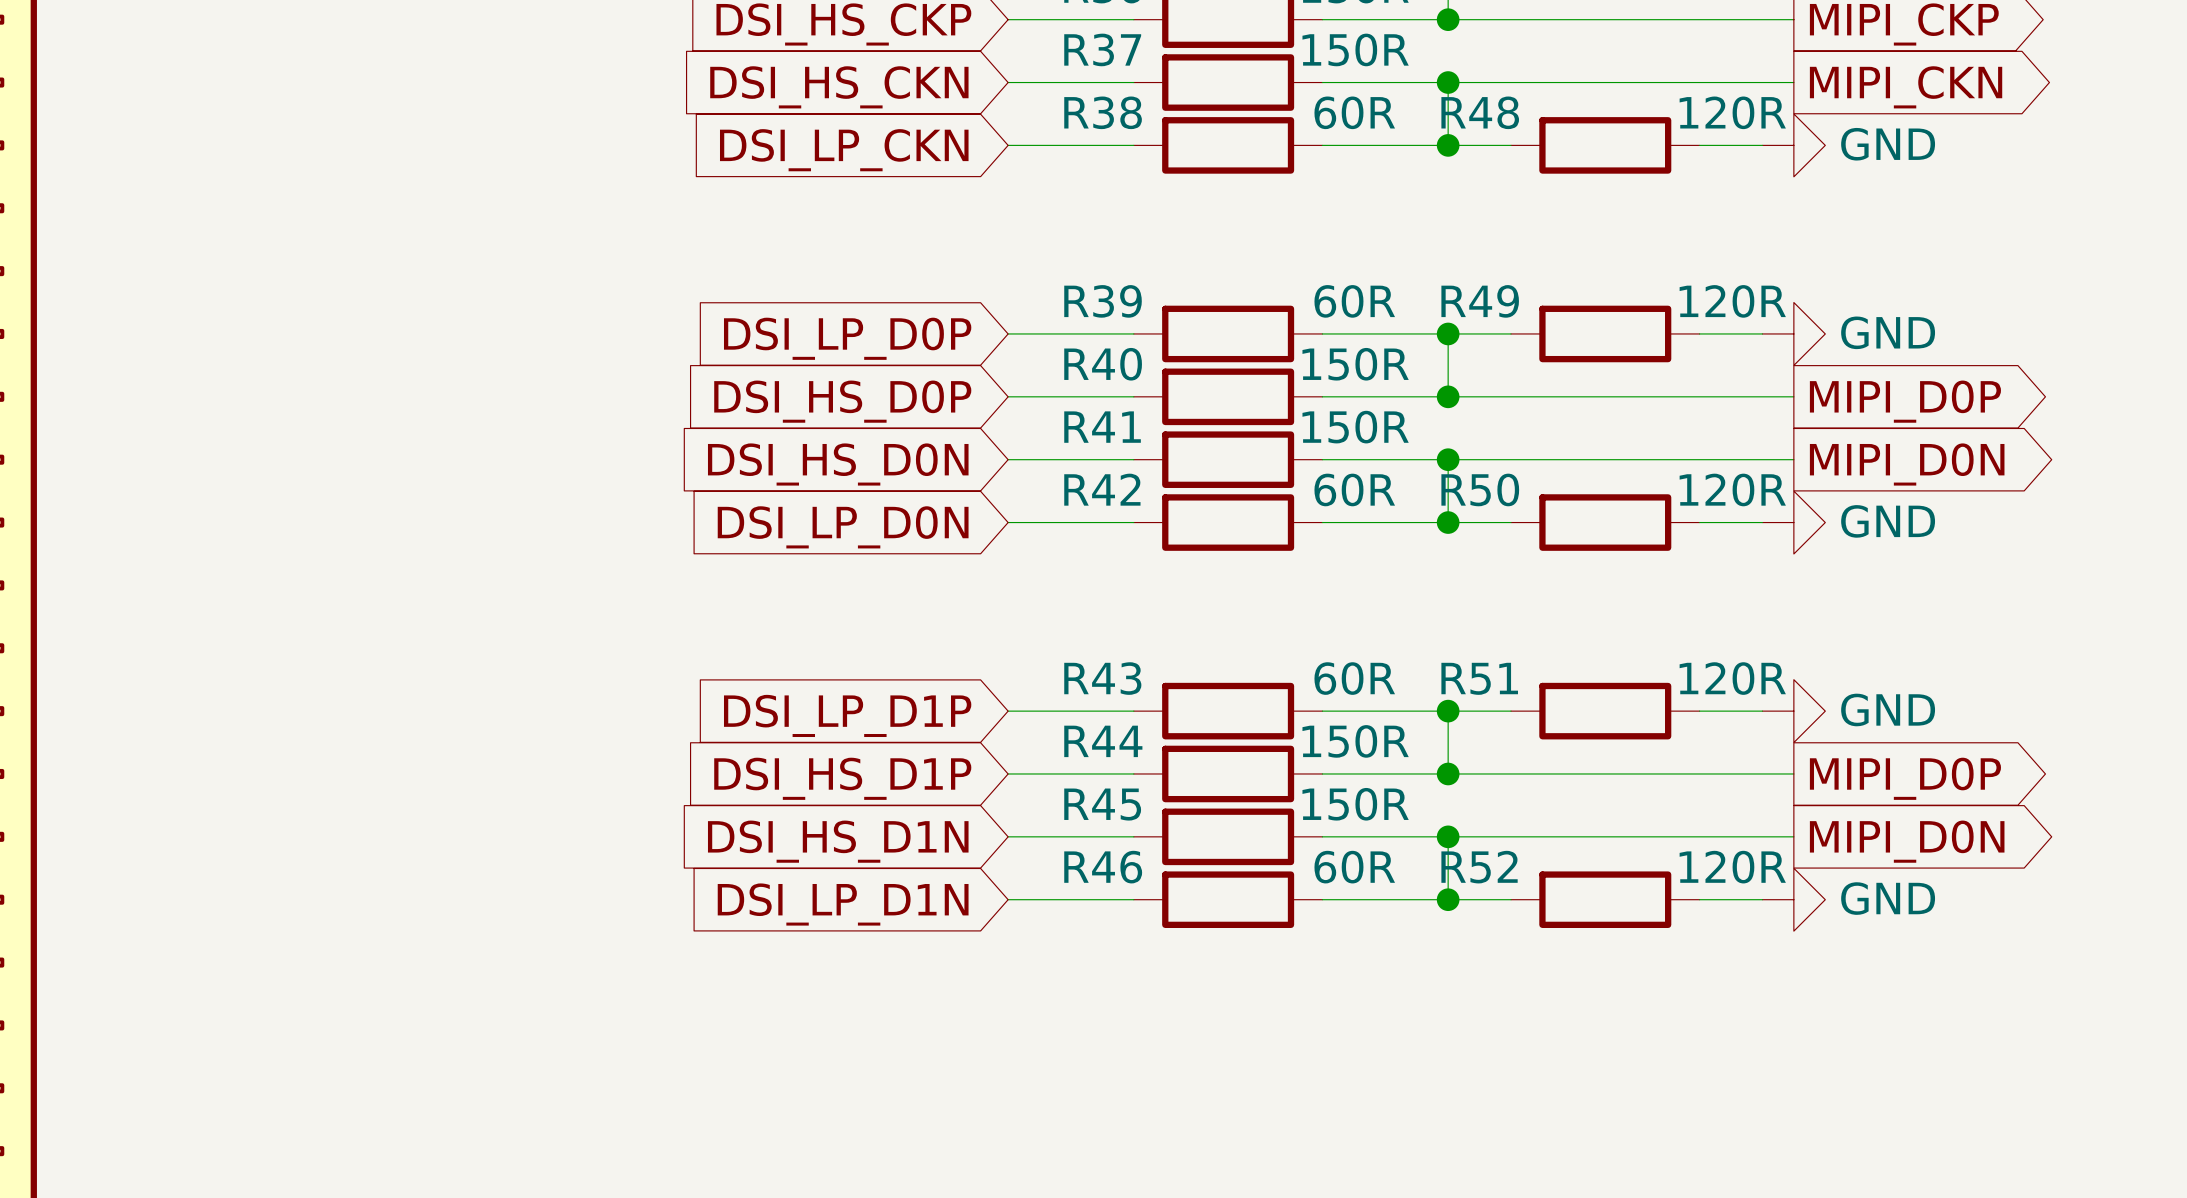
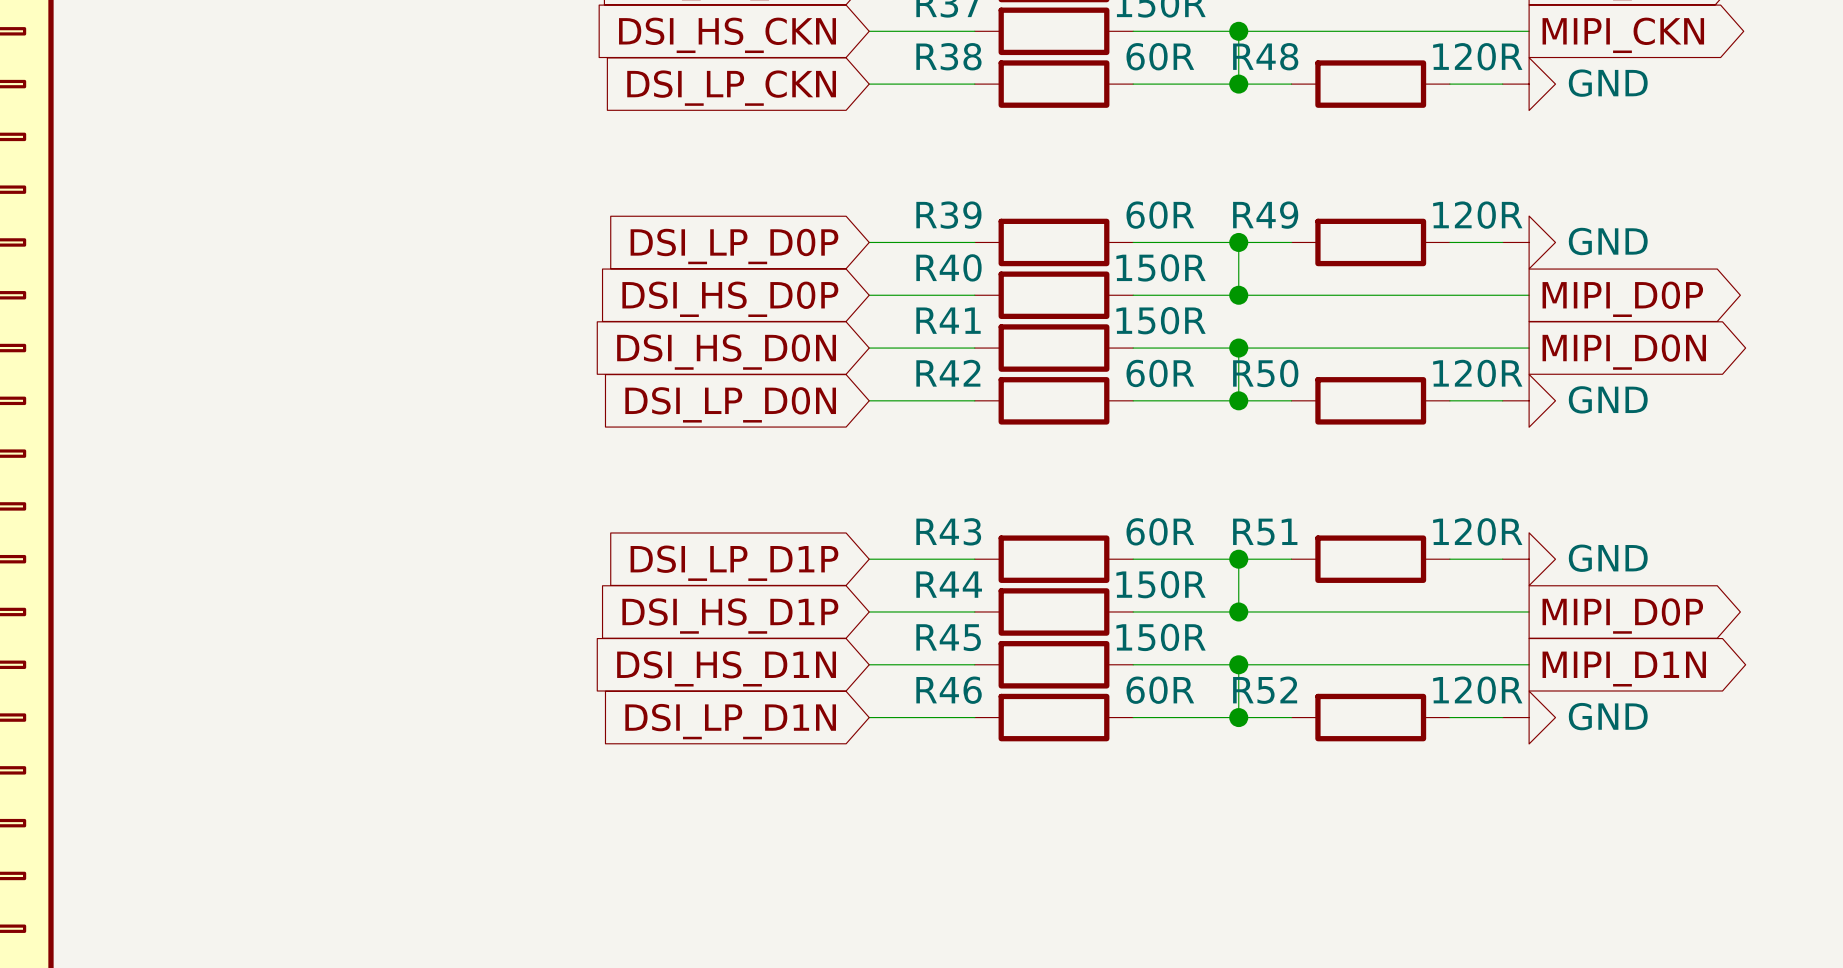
global label: MIPI_D0N (1907, 841) -> MIPI_D1N (1624, 669)

